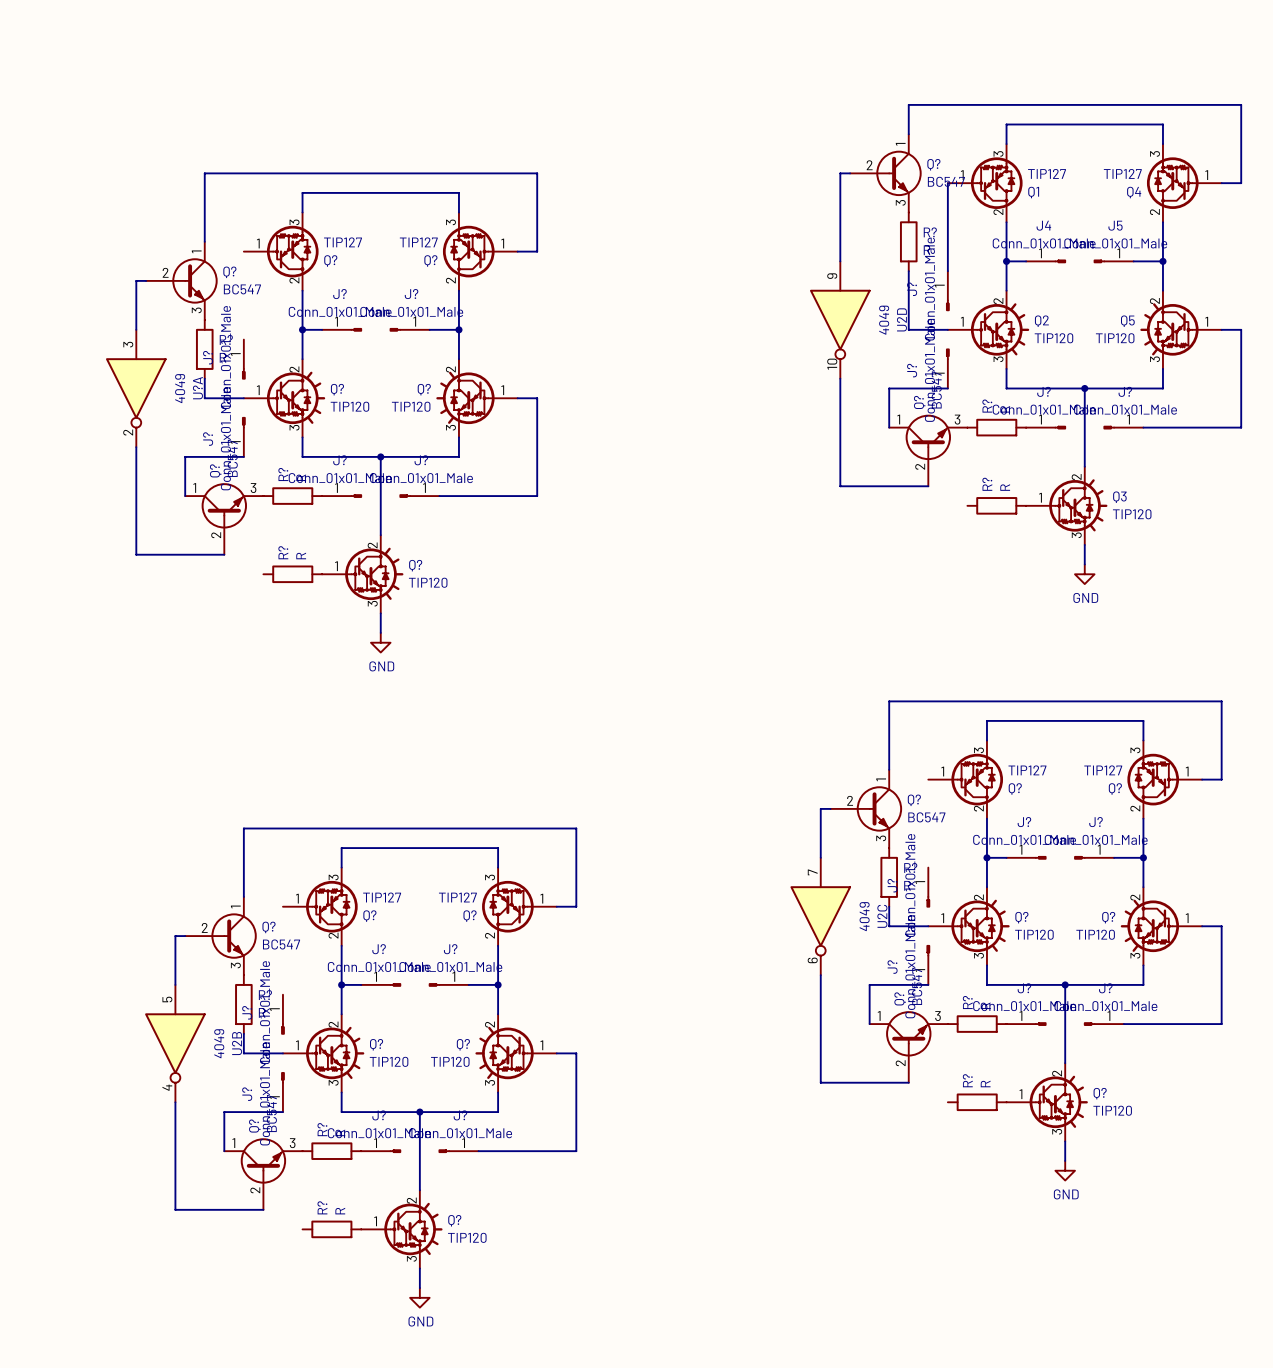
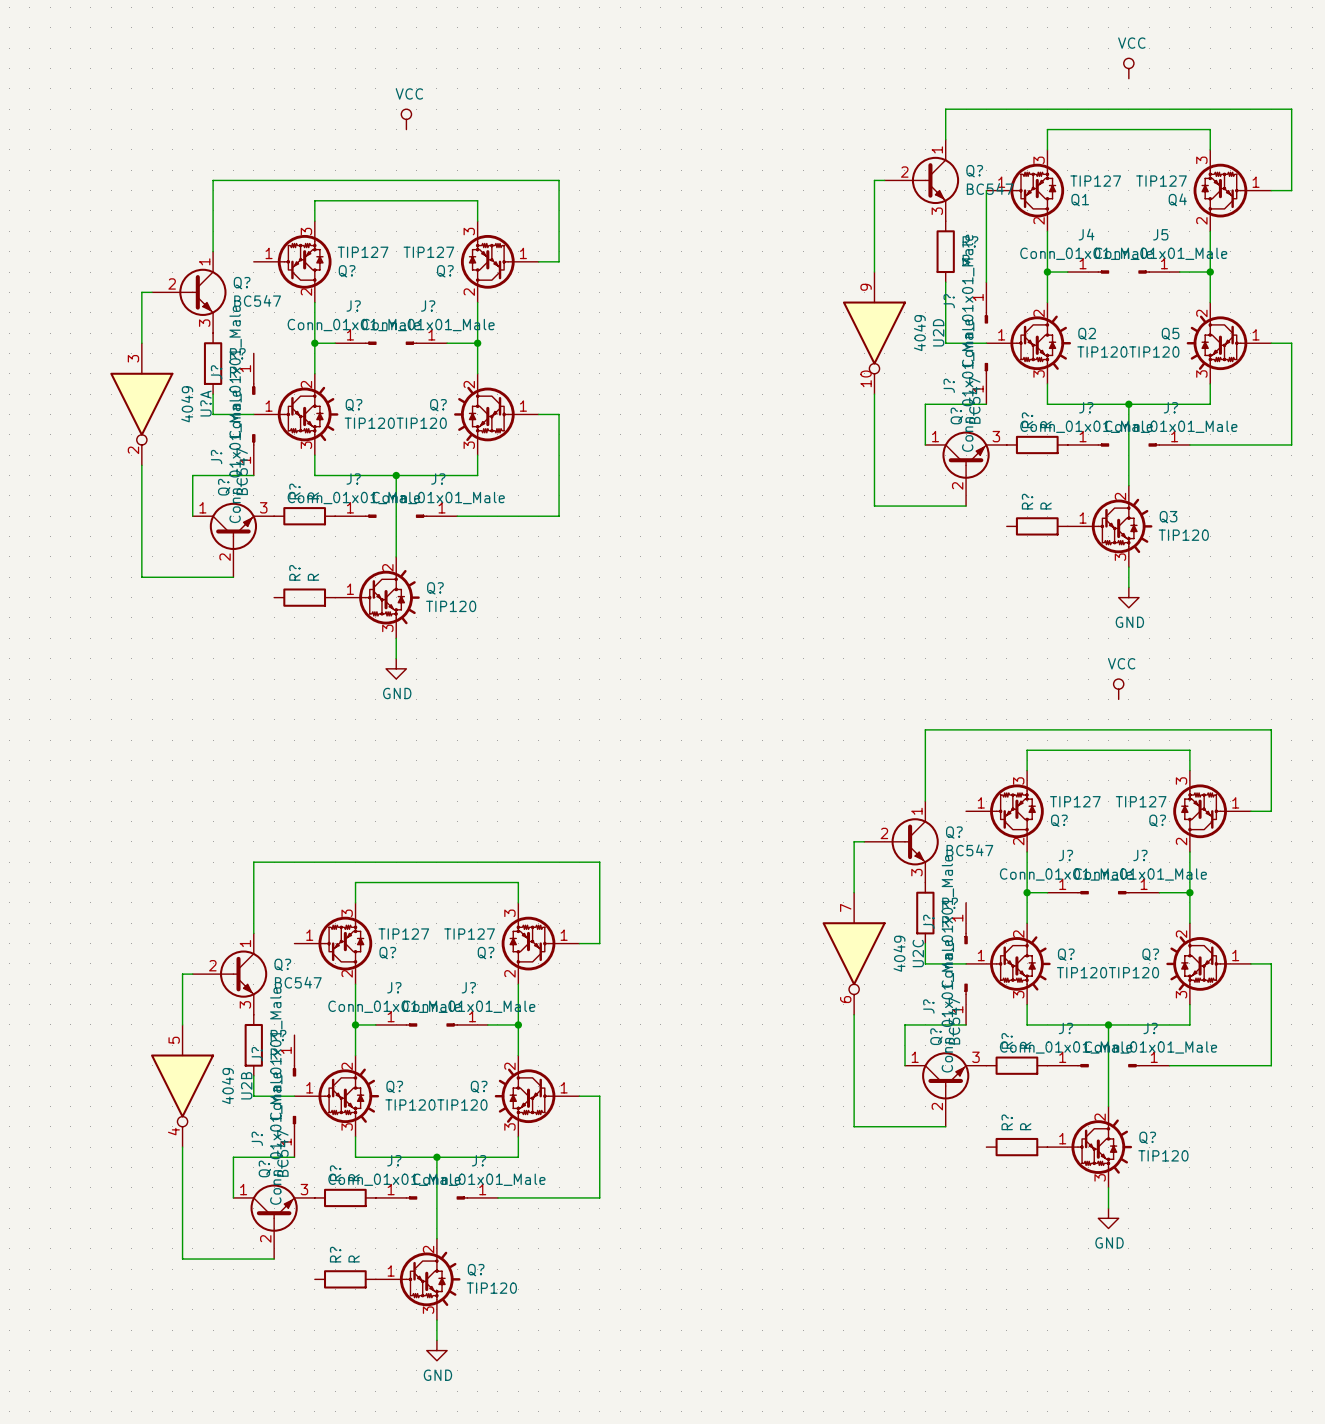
power symbol: none -> VCC (1128, 68)
power symbol: none -> VCC (406, 119)
power symbol: none -> VCC (1118, 689)

